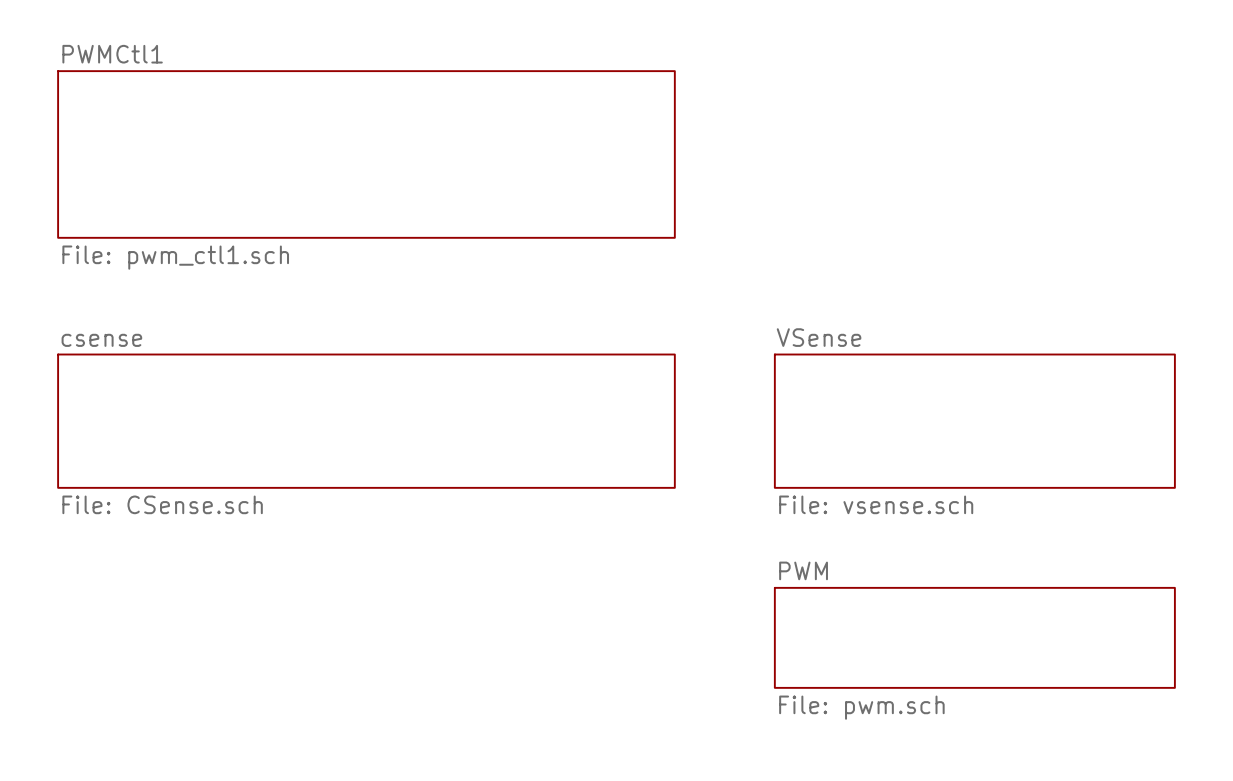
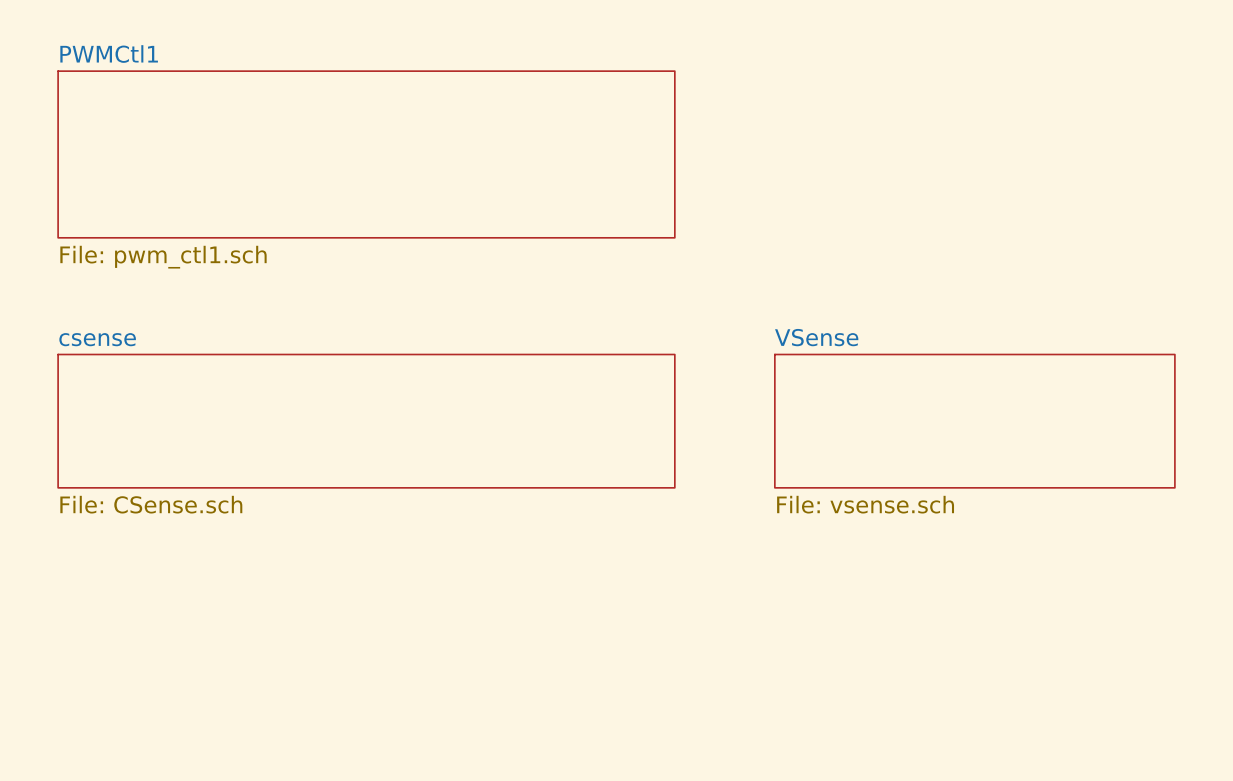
sheet PWM: File: pwm.sch (974, 637) -> none

